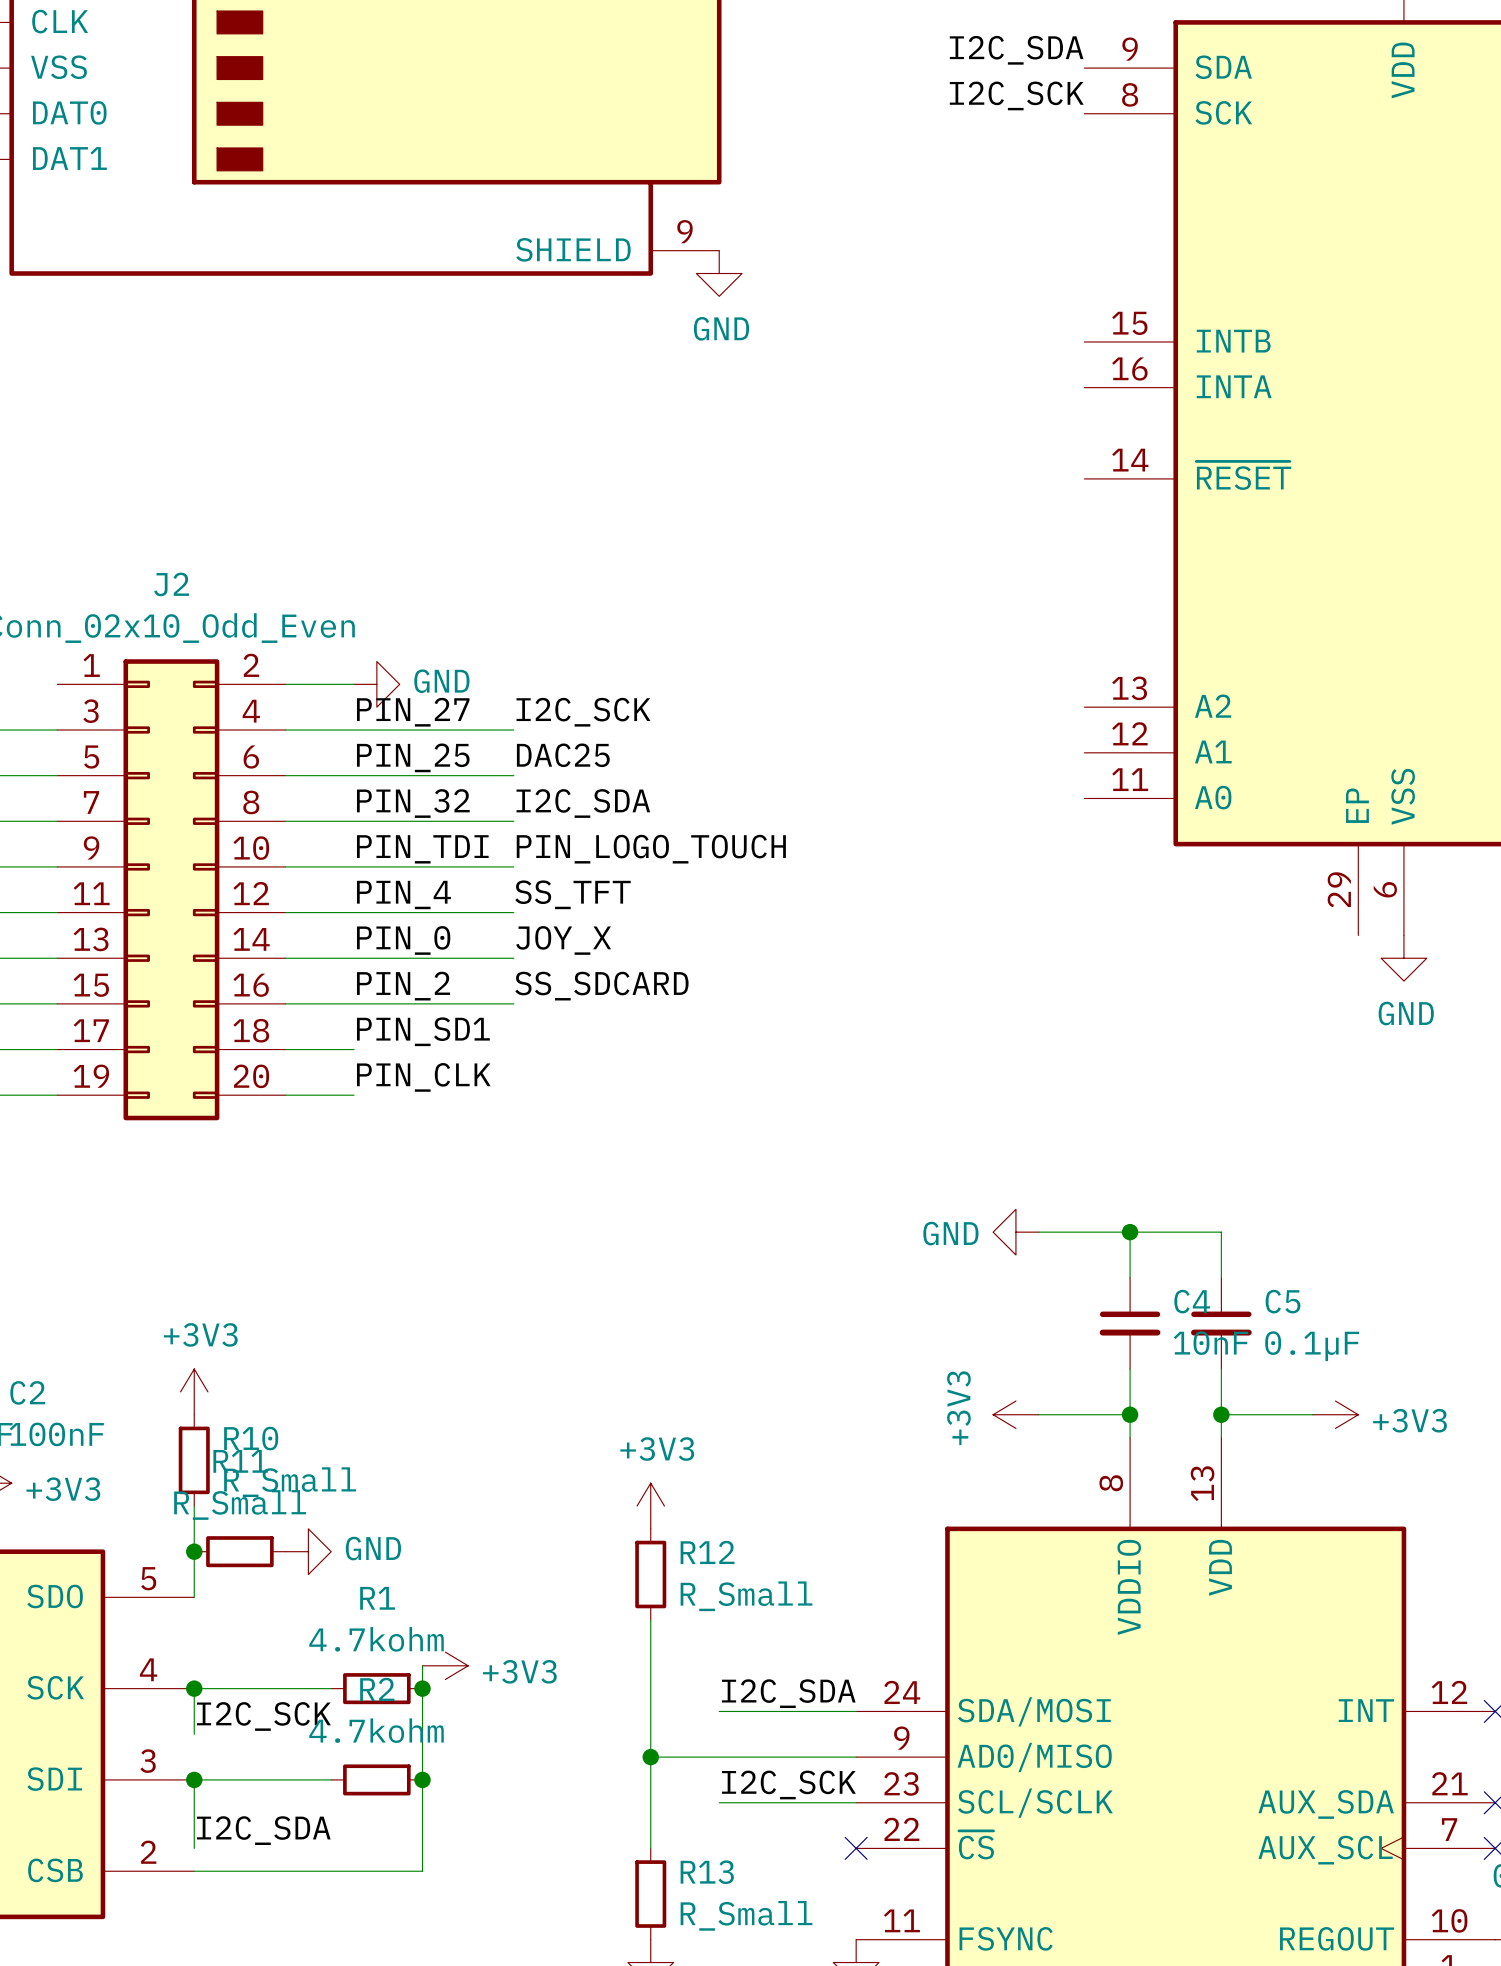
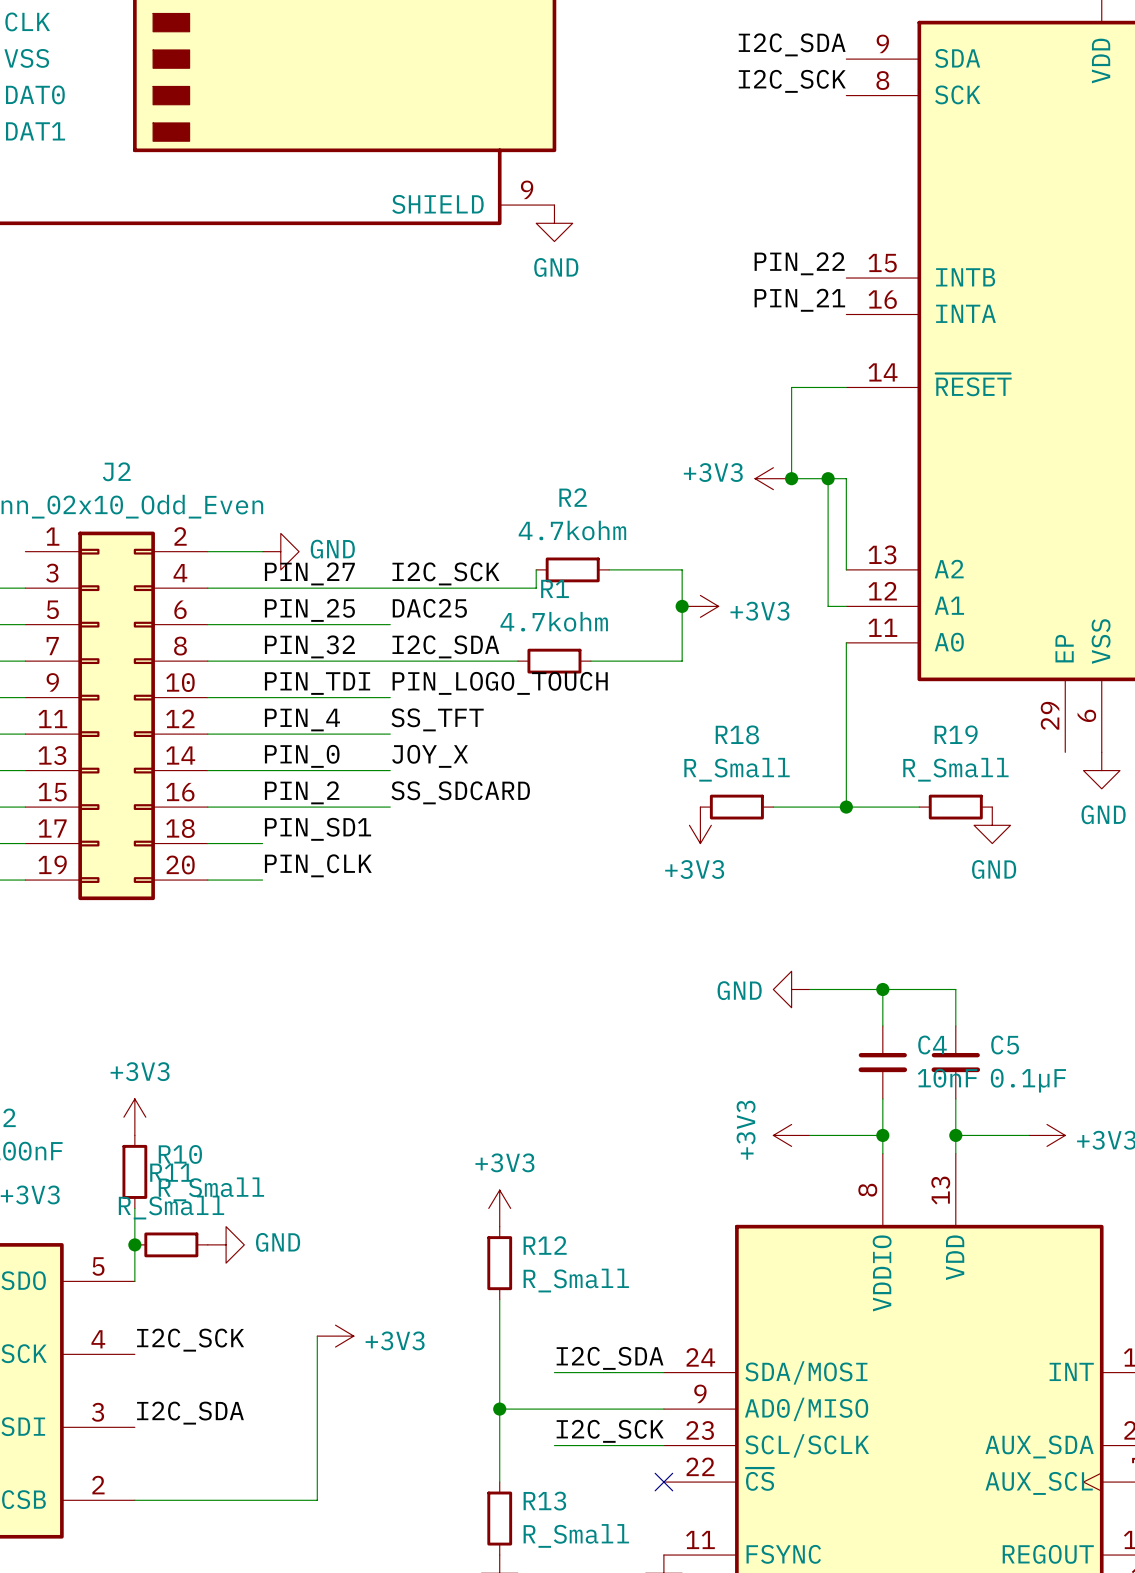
label: none -> PIN_22 (799, 263)
label: none -> PIN_21 (799, 300)
wire: none -> (846, 387) (791, 387) (791, 478) (846, 478) (846, 569)
power symbol: none -> +3V3 (773, 478)
junction: none -> (791, 478)
wire: none -> (828, 478) (828, 606) (846, 606)
junction: none -> (828, 478)
wire: none -> (536, 569) (536, 588) (390, 588)
wire: none -> (609, 569) (682, 569) (682, 661) (590, 661)
junction: none -> (682, 606)
power symbol: none -> +3V3 (700, 606)
wire: none -> (846, 642) (846, 807)
wire: none -> (390, 661) (517, 661)
R18: none -> R_Small (736, 807)
wire: none -> (773, 807) (919, 807)
junction: none -> (846, 807)
R19: none -> R_Small (955, 807)
power symbol: none -> +3V3 (700, 825)
power symbol: none -> GND (992, 825)
junction: (194, 1688) -> none
wire: (331, 1688) (194, 1688) (194, 1734) -> none
R1 position: (376, 1688) -> (554, 661)
junction: (422, 1688) -> none
label position: I2C_SCK (263, 1716) -> I2C_SCK (190, 1340)
junction: (194, 1779) -> none
wire: (331, 1779) (194, 1779) (194, 1848) -> none
R2 position: (376, 1779) -> (572, 569)
junction: (422, 1779) -> none
label position: I2C_SDA (263, 1830) -> I2C_SDA (190, 1413)

